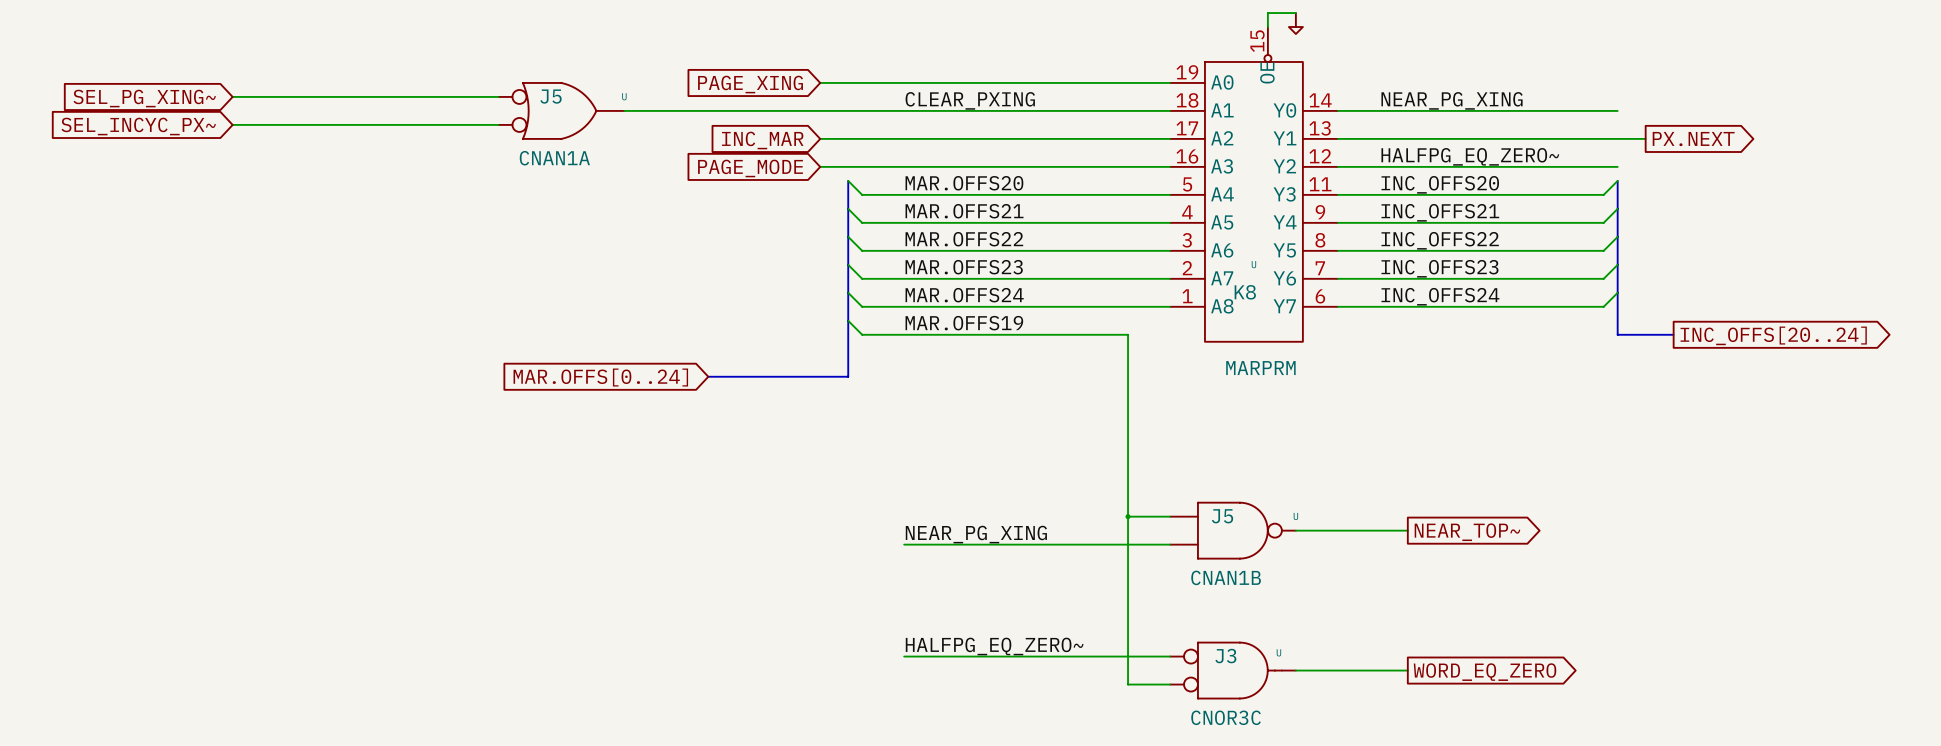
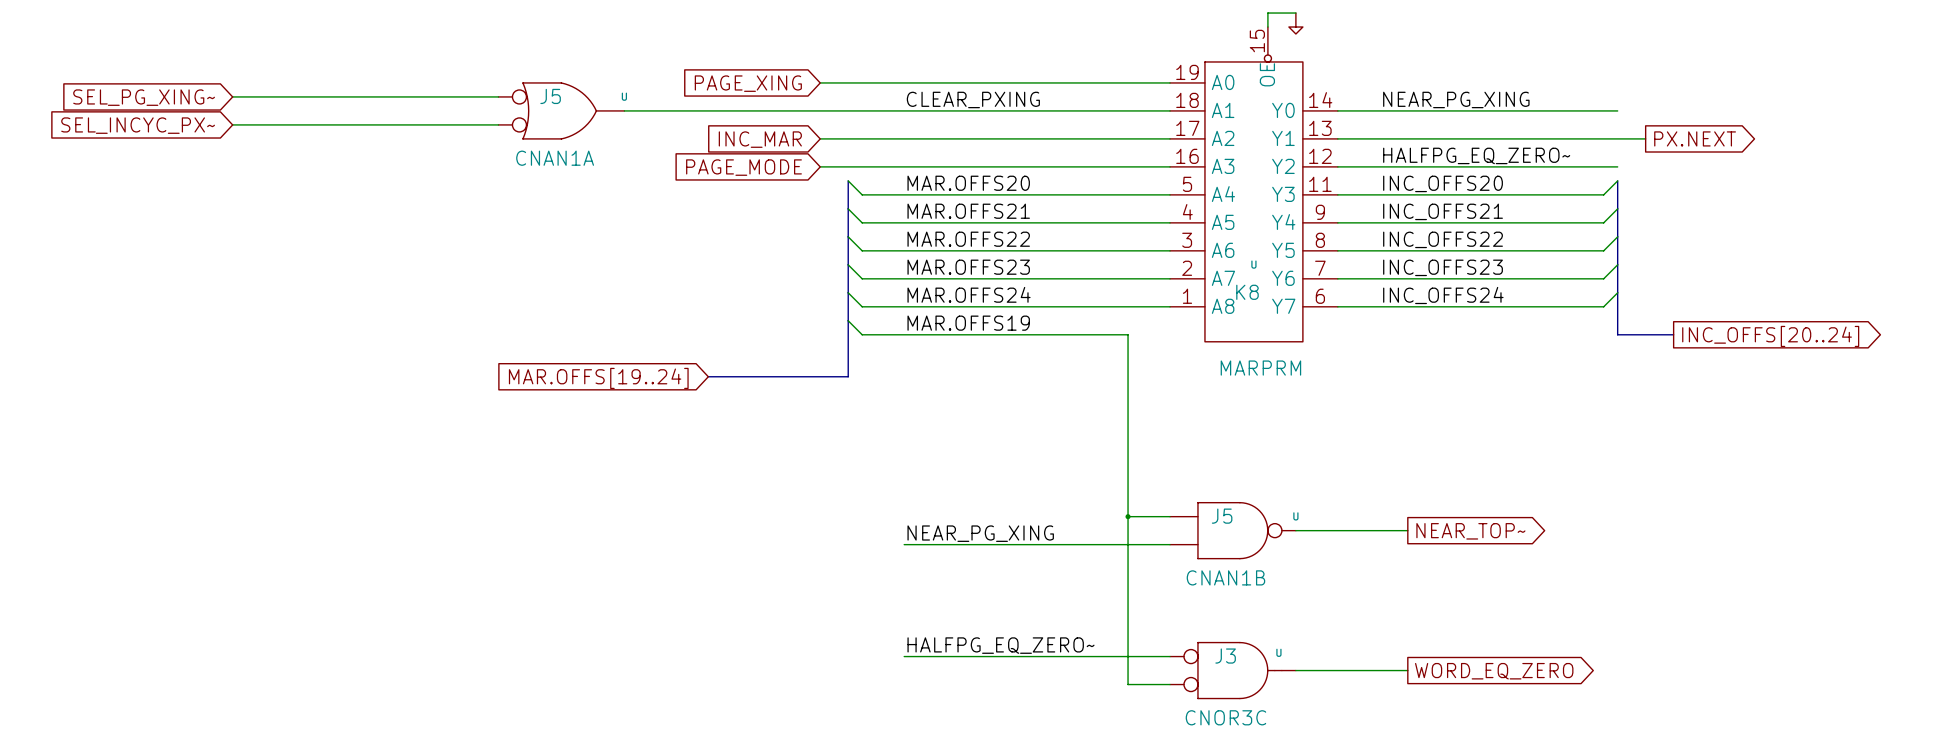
global label: MAR.OFFS[0..24] (600, 377) -> MAR.OFFS[19..24] (598, 378)

